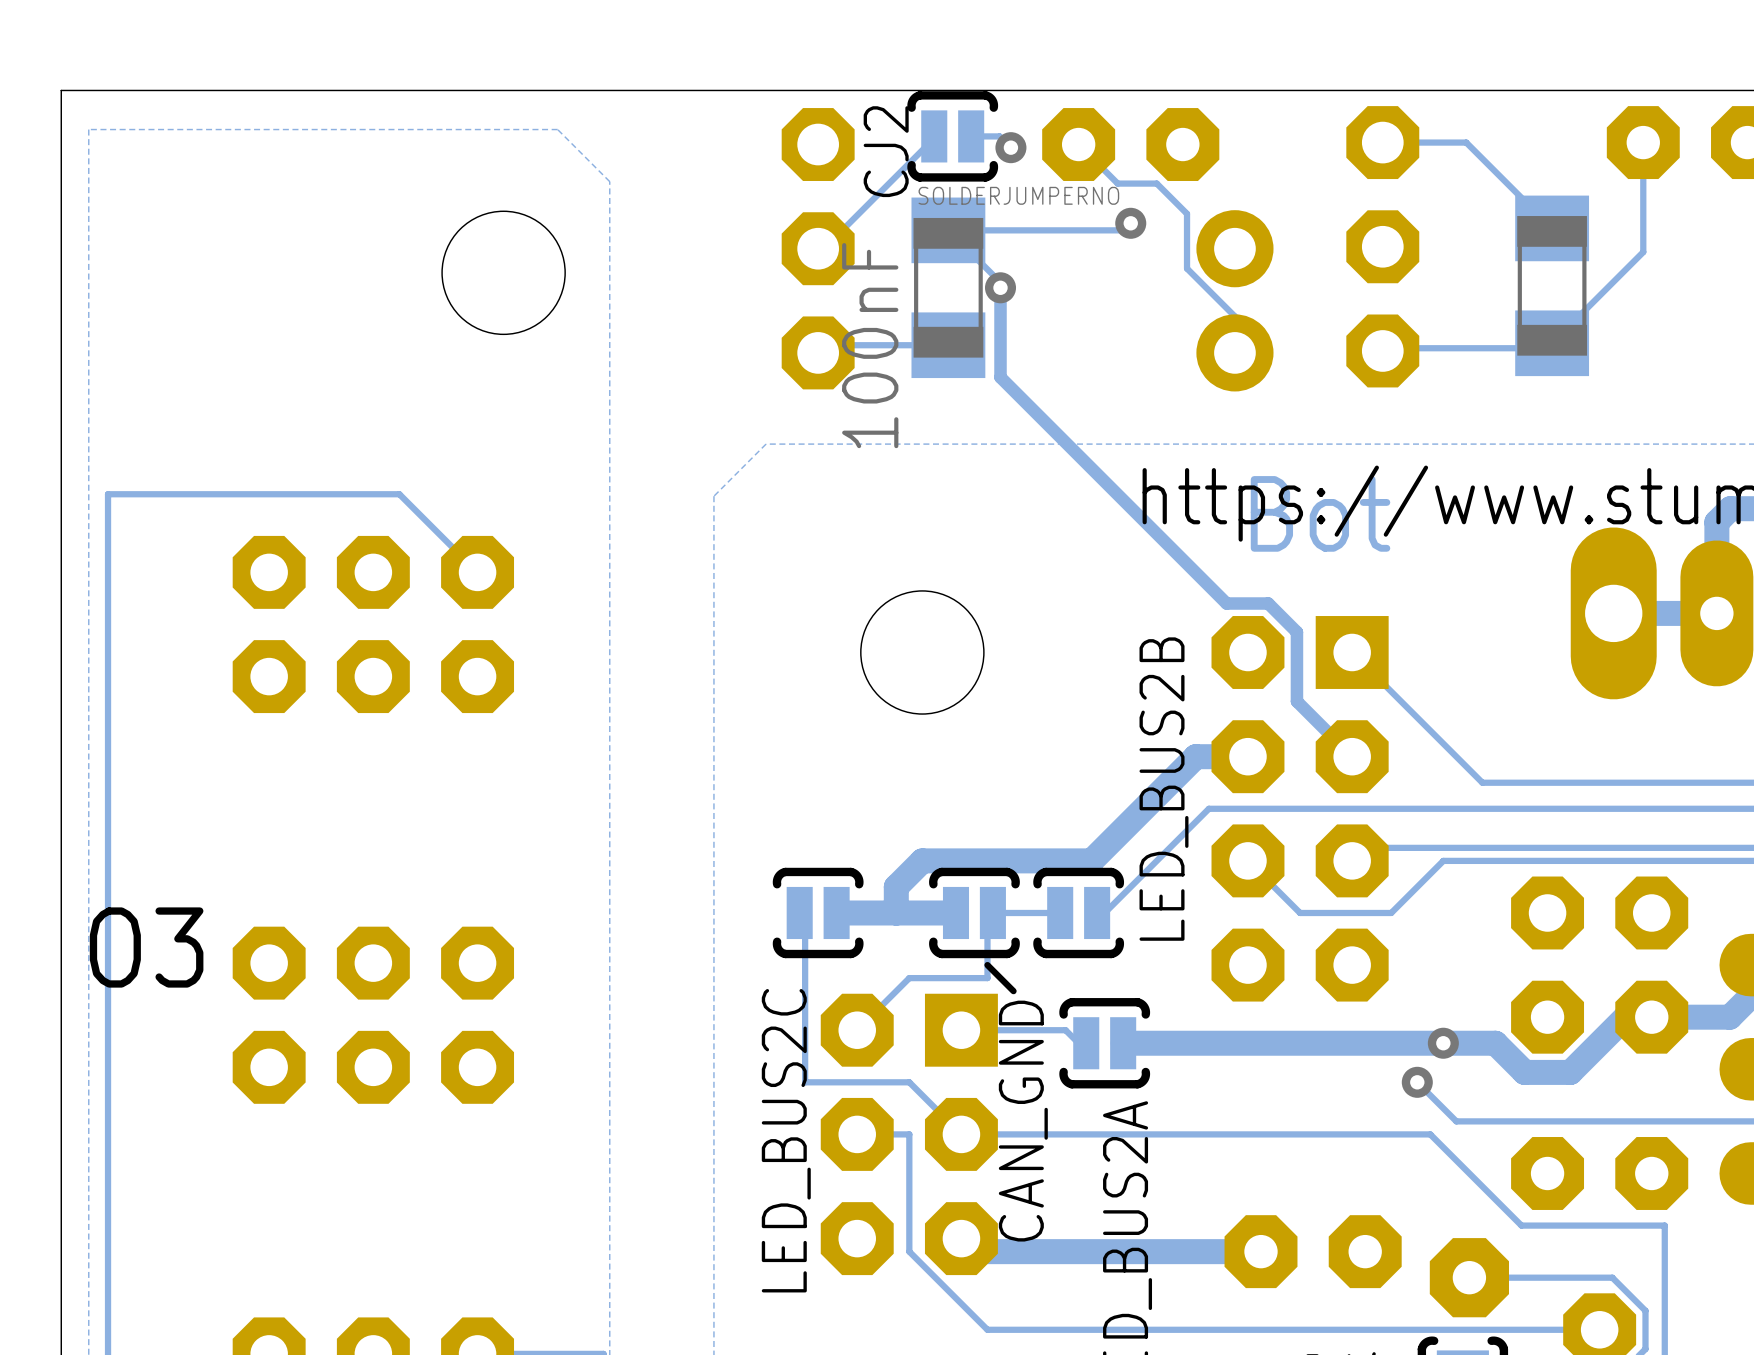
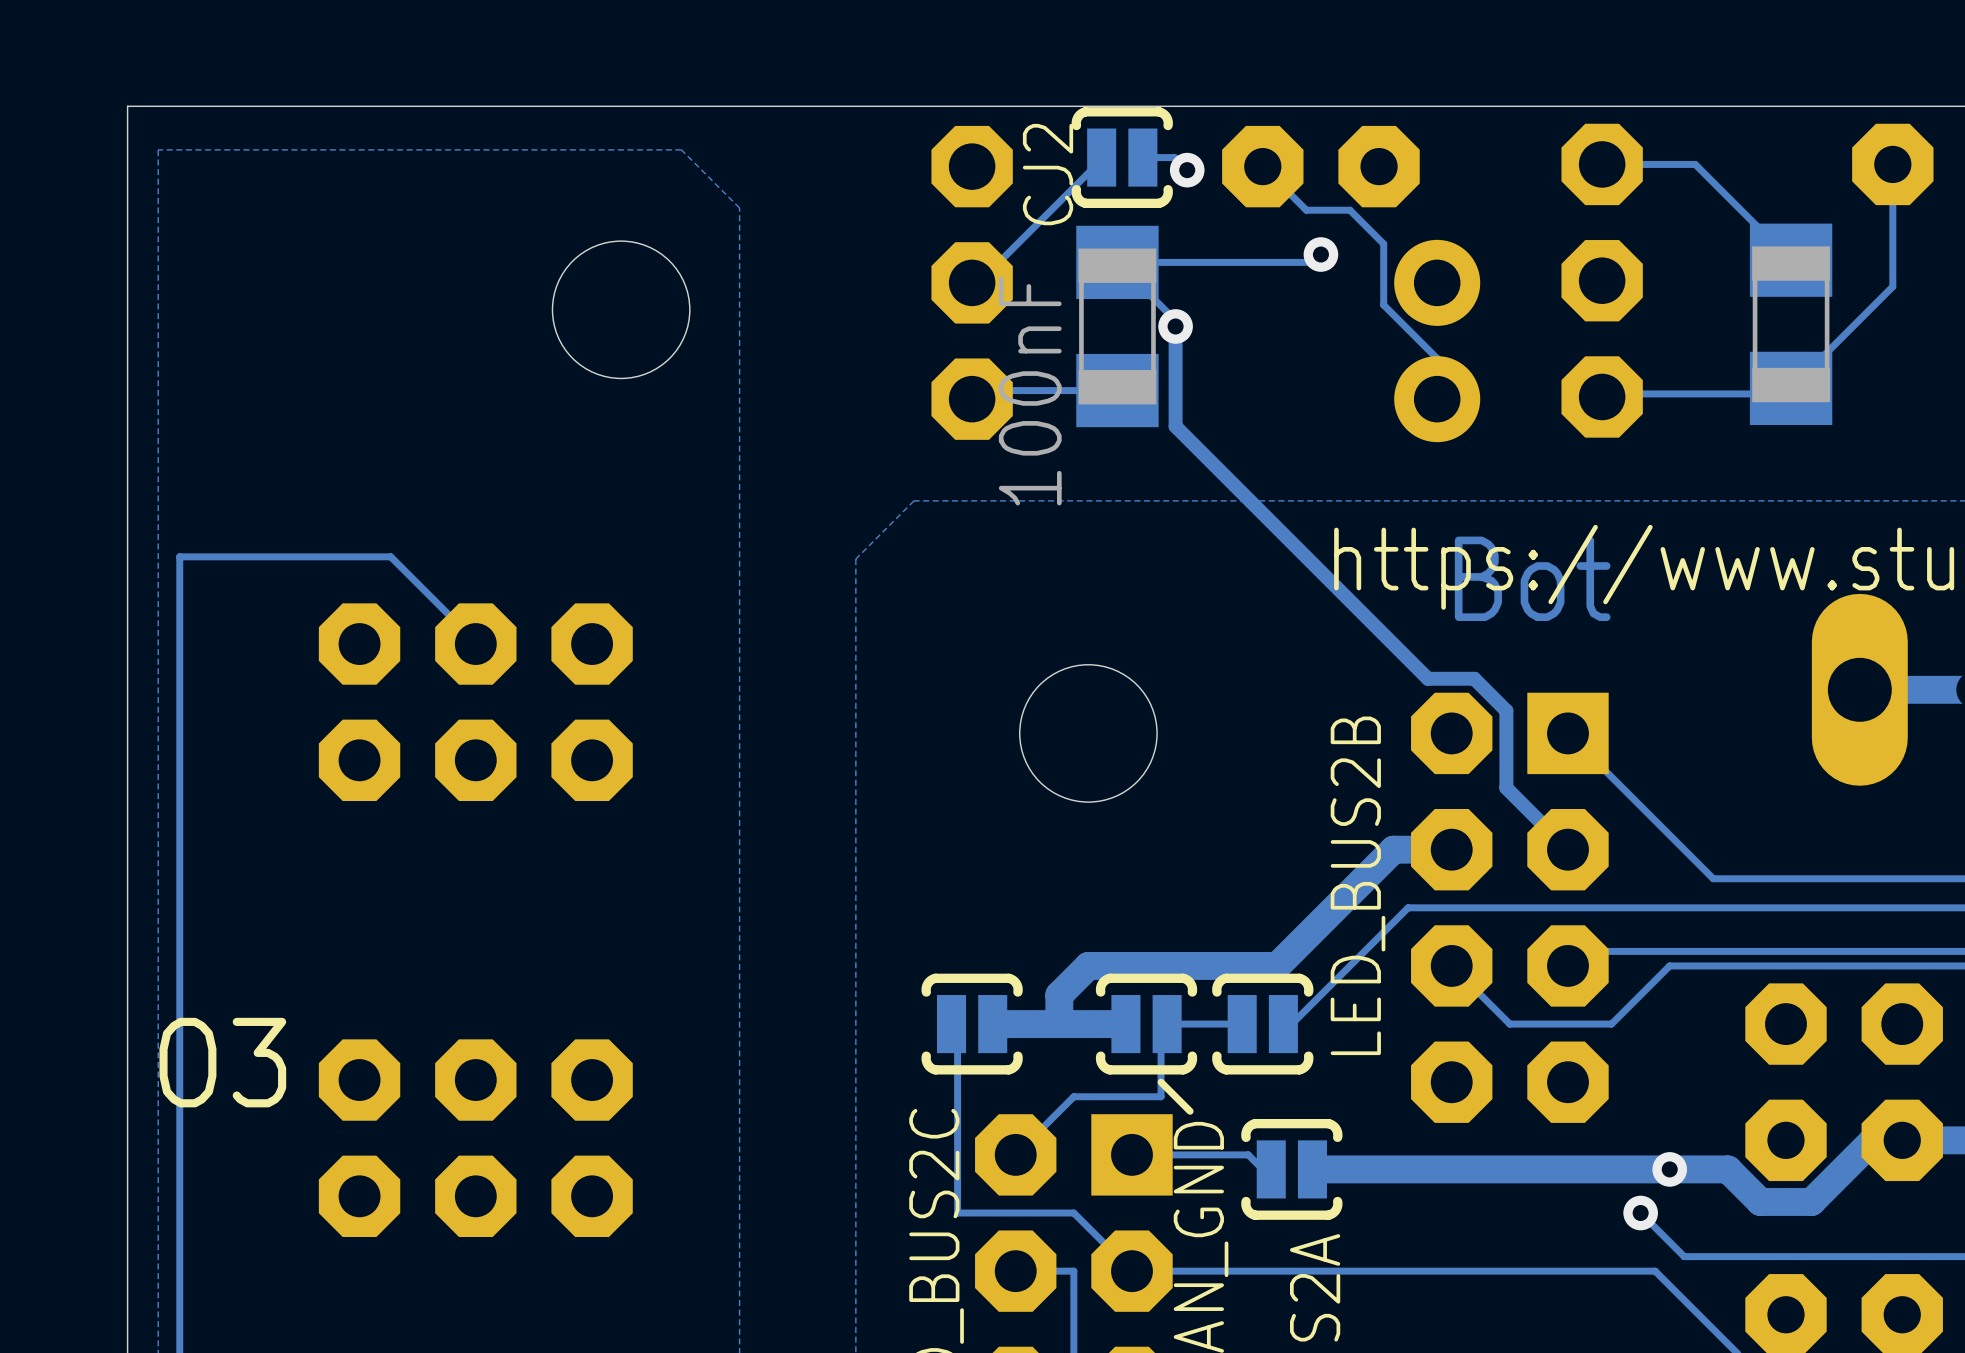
CJ2 value: SOLDERJUMPERNO (1018, 195) -> none
track: (297, 494) (399, 494) (477, 572) -> (390, 556) (475, 641) (475, 644)

